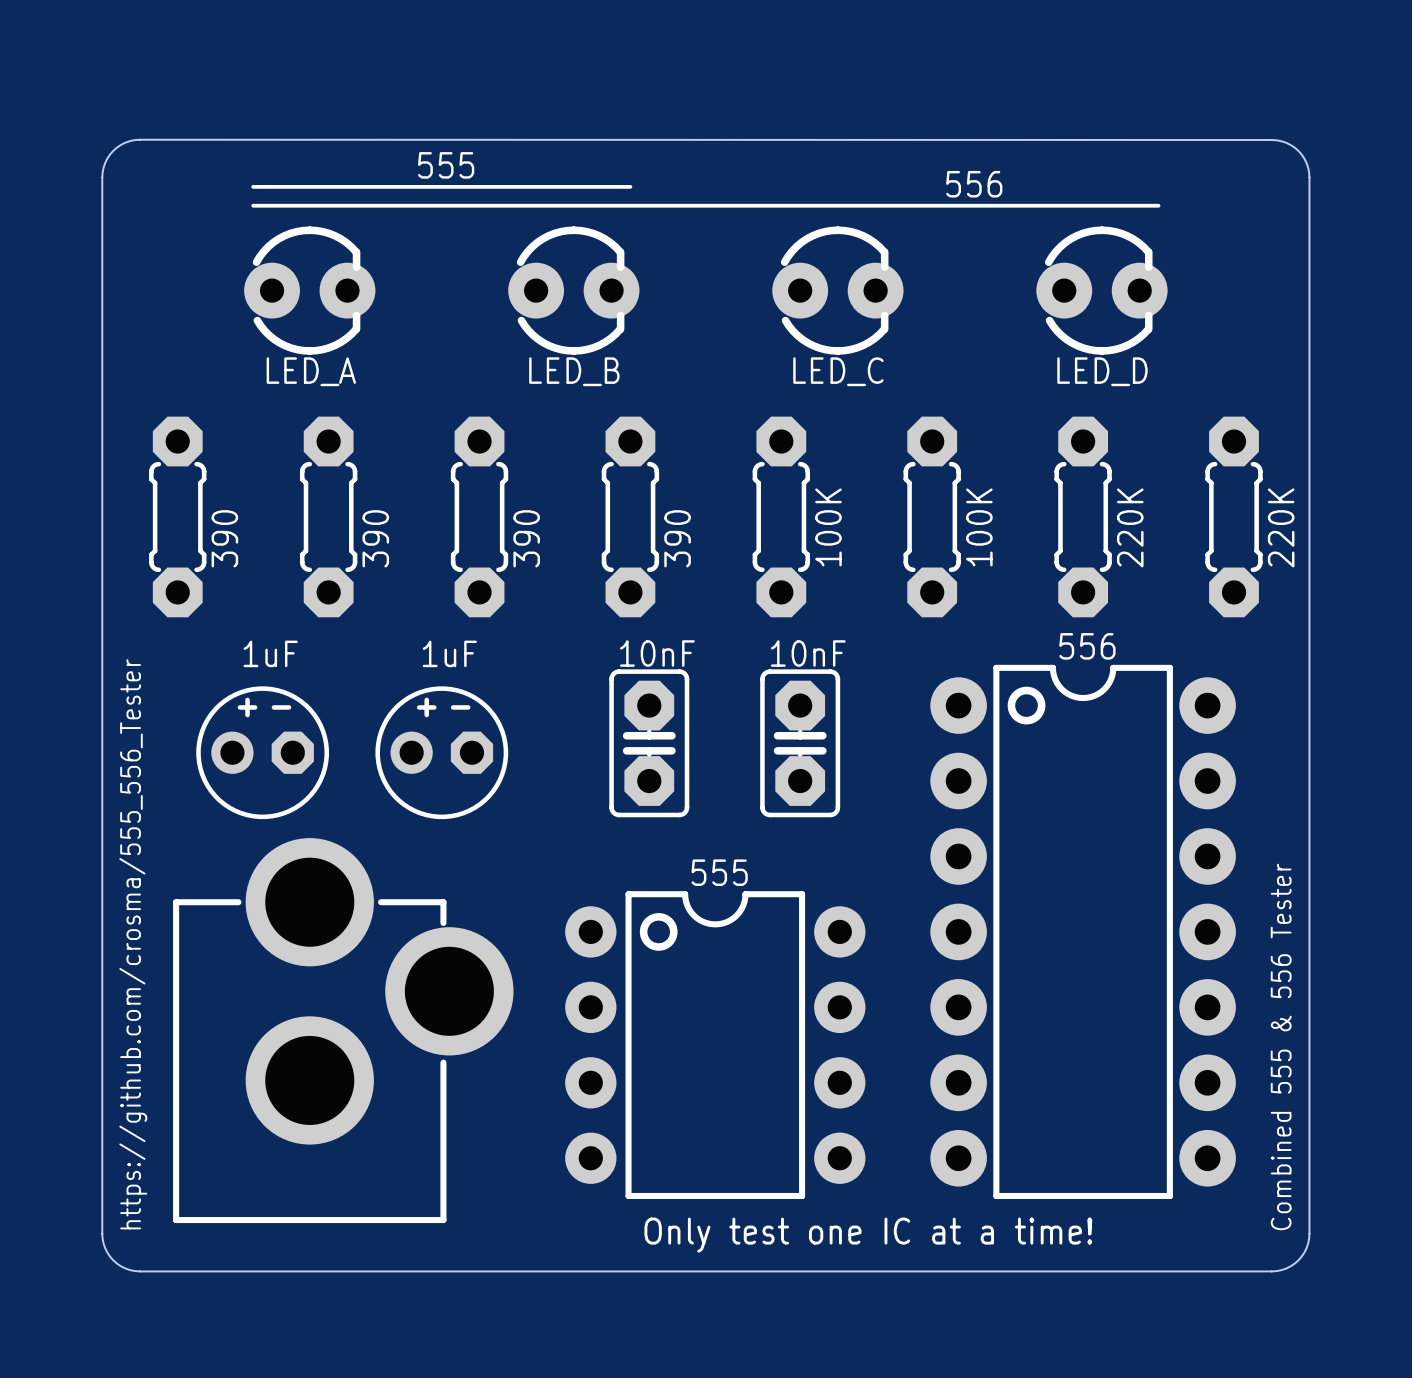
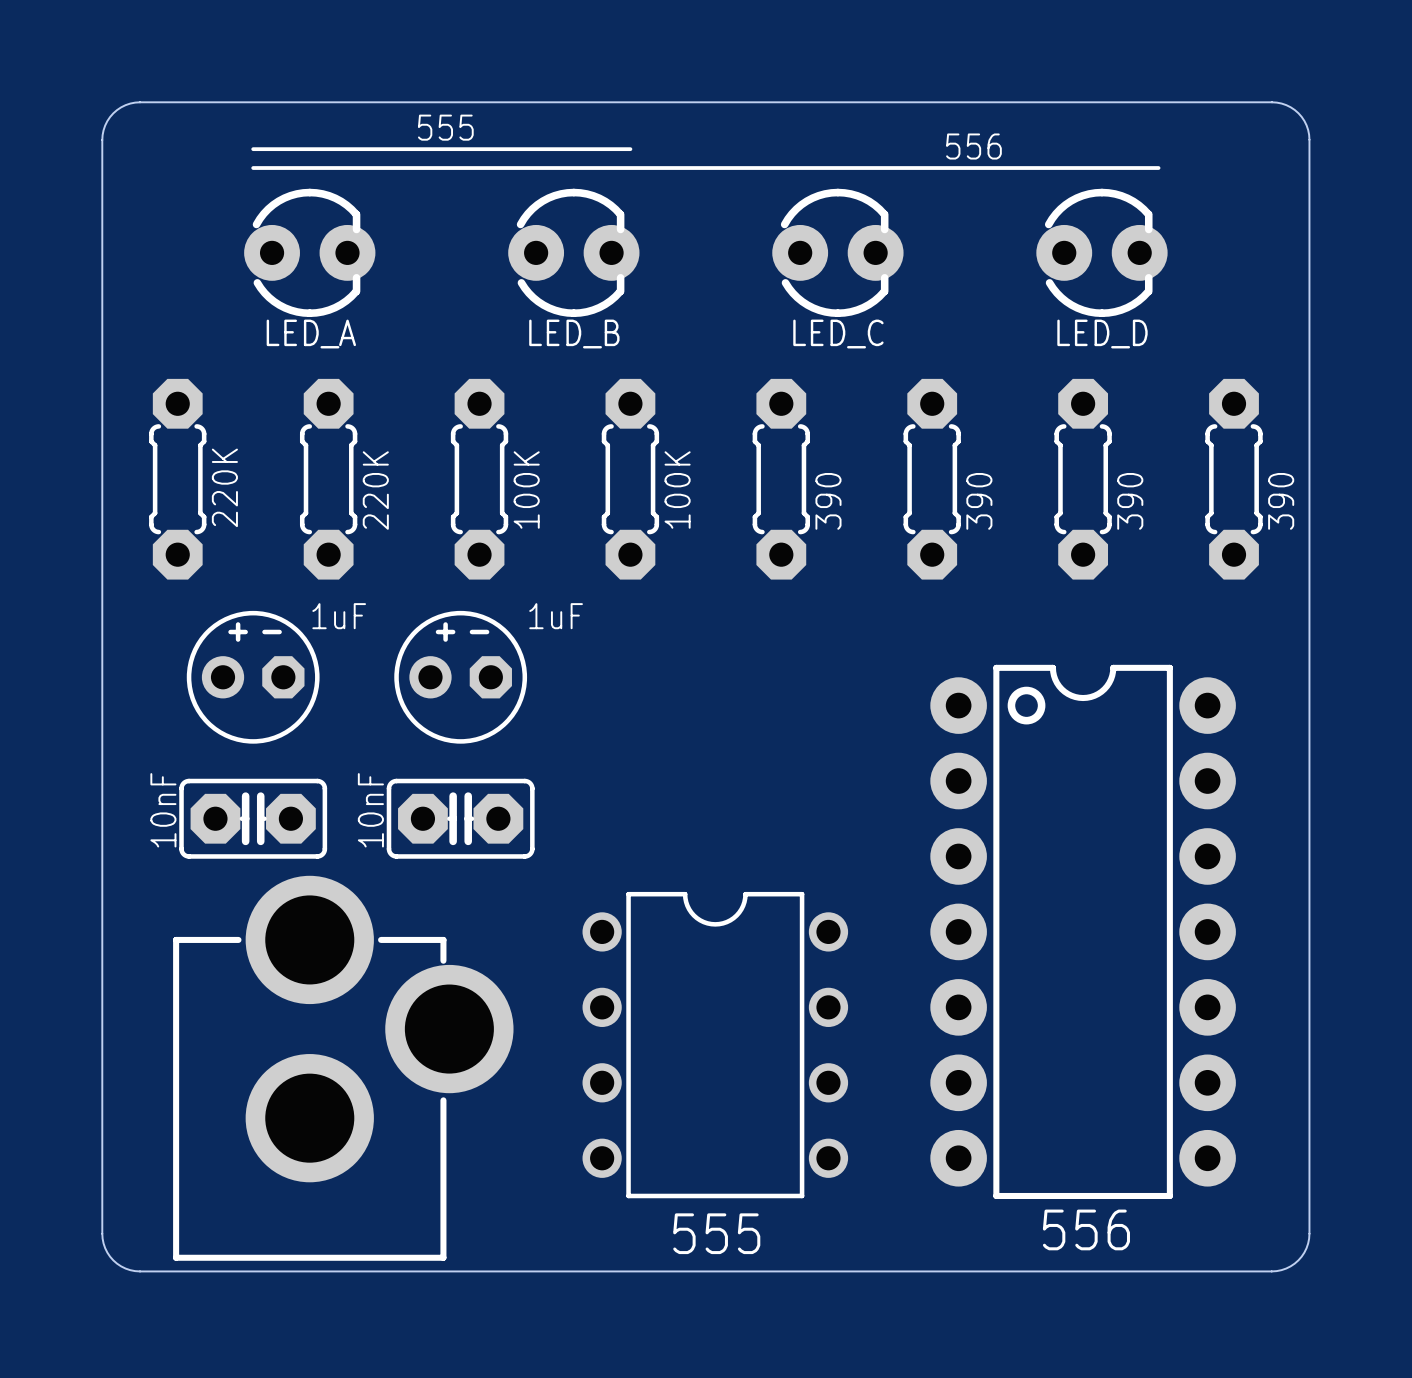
text position: 555 (446, 165) -> 555 (445, 127)
board edge: (102, 177) (105, 163) (113, 150) (125, 142) (140, 139) (1272, 140) (1286, 142) (1298, 150) (1306, 163) (1309, 177) -> (102, 177) (102, 135) (107, 121) (121, 107) (140, 102) (1272, 102) (1290, 107) (1304, 121) (1309, 134) (1309, 177)
text position: 556 (974, 184) -> 556 (973, 146)
line: (253, 186) (630, 186) -> (253, 149) (630, 149)
line: (253, 205) (1158, 205) -> (253, 168) (1158, 168)
part position: (309, 290) -> (309, 252)
part position: (573, 290) -> (573, 252)
part position: (837, 290) -> (837, 252)
part position: (1101, 290) -> (1101, 252)
part: none -> 220K (177, 479)
part: none -> 220K (328, 479)
part: none -> 100K (479, 479)
part: none -> 100K (630, 479)
part: none -> 390 (781, 479)
part: none -> 390 (932, 479)
part: none -> 390 (1083, 479)
part: none -> 390 (1234, 479)
part: 390 (177, 516) -> none
part: 390 (328, 516) -> none
part: 390 (479, 516) -> none
part: 390 (630, 516) -> none
part: 100K (781, 516) -> none
part: 100K (932, 516) -> none
part: 220K (1083, 516) -> none
part: 220K (1234, 516) -> none
part text: 556 (1087, 646) -> none
part value position: 1uF (449, 653) -> 1uF (556, 616)
part: none -> 1uF (253, 677)
part: 10nF (649, 743) -> none
part: 10nF (800, 743) -> none
part: 1uF (262, 752) -> none
part position: (441, 752) -> (460, 677)
part: none -> 10nF (253, 818)
part: none -> 10nF (460, 818)
text: https://github.com/crosma/555_556_Tester (133, 944) -> none
part position: (343, 1030) -> (343, 1068)
555: (715, 1045) -> none
part: none -> 555 (715, 1045)
text: Combined 555 & 556 Tester (1281, 1046) -> none
part value: none -> 556 (1086, 1229)
text: Only test one IC at a time! (868, 1235) -> none

